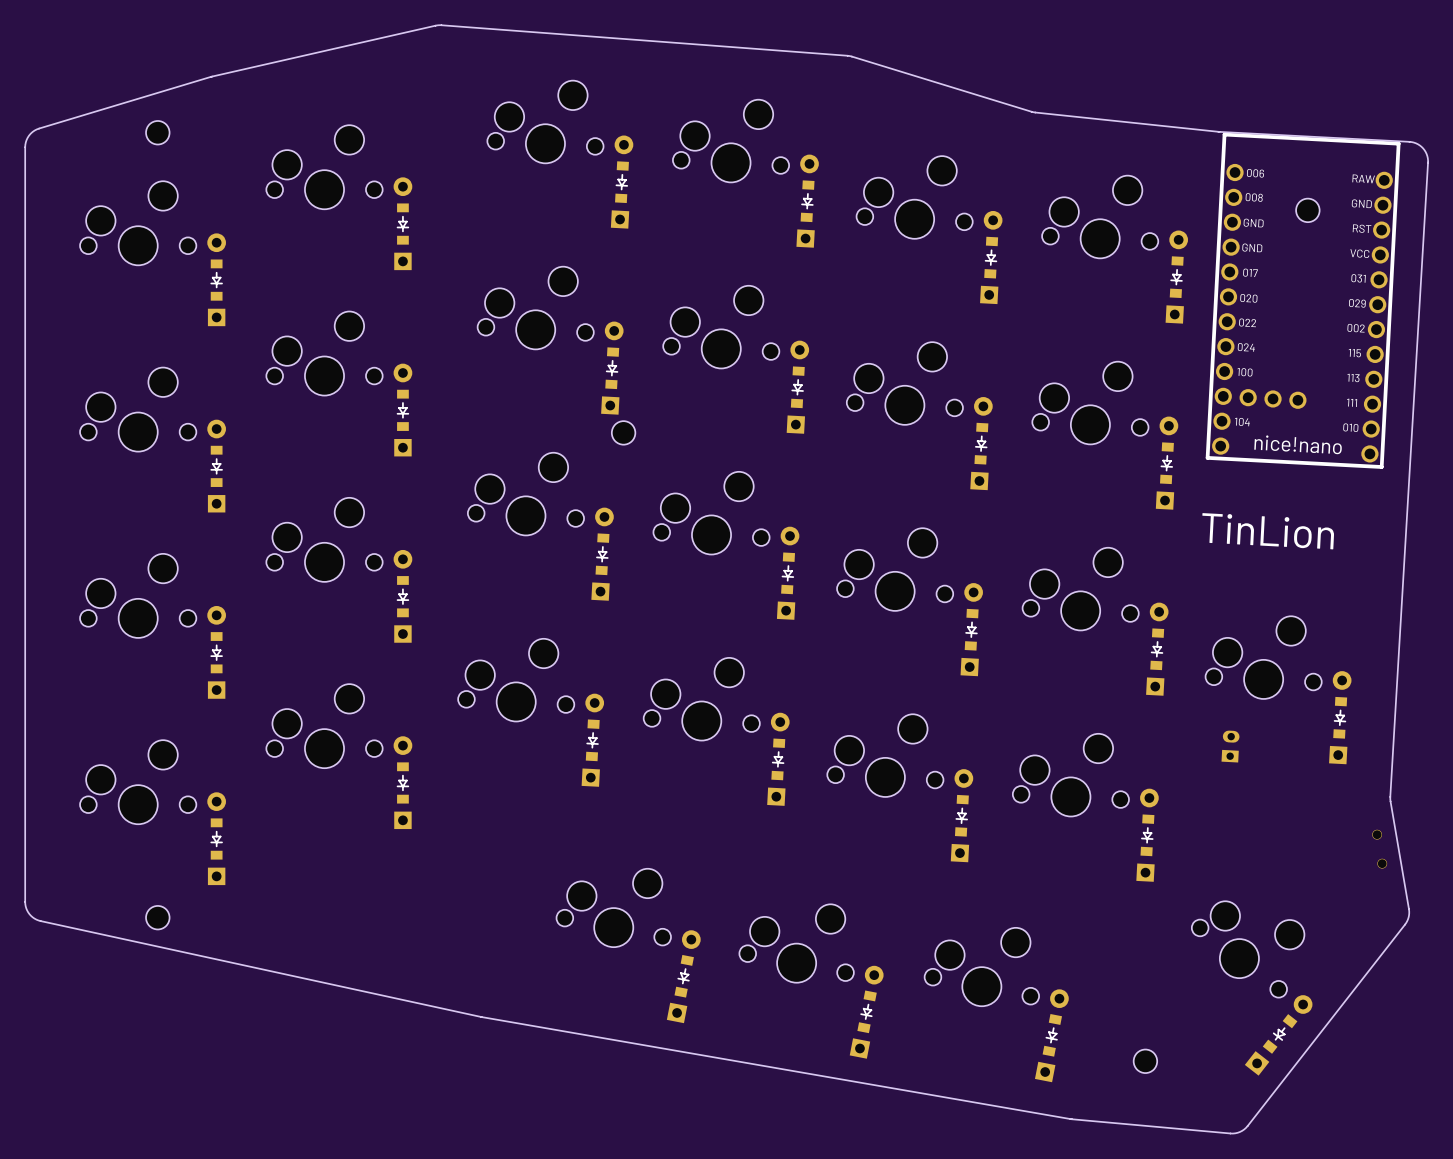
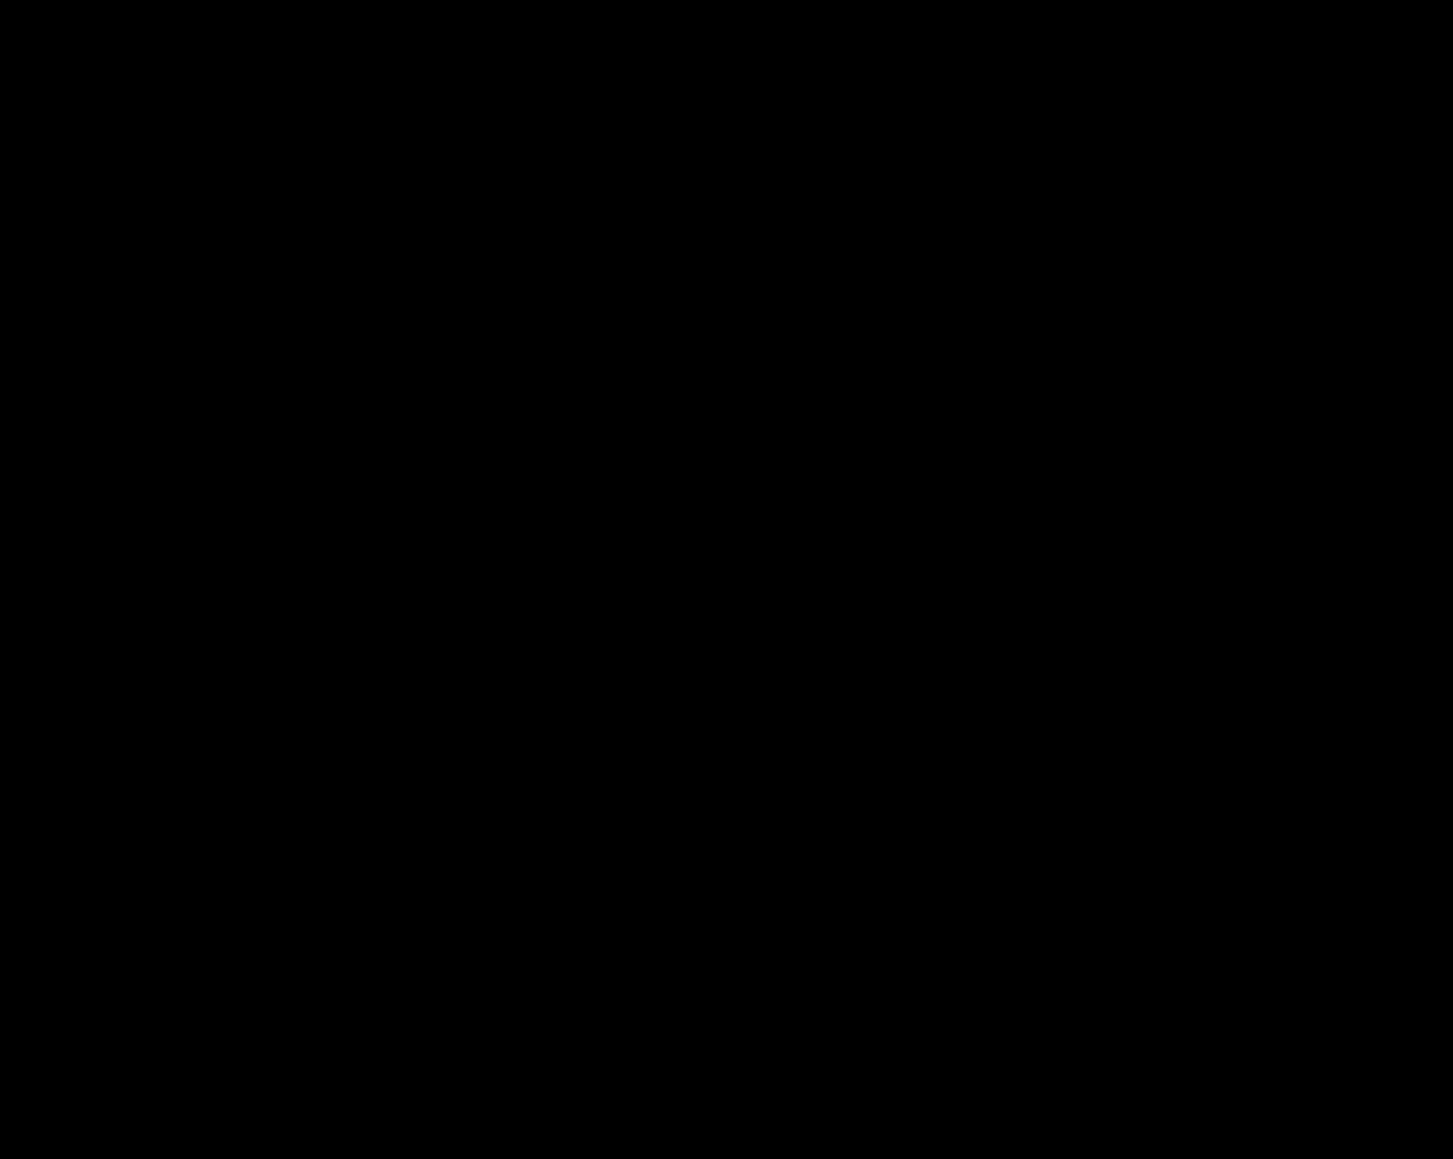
part: (545, 121) -> none
part: (157, 132) -> none
part: (731, 141) -> none
board edge: (25, 147) (25, 901) (28, 912) (34, 918) (481, 1017) (1070, 1119) (1232, 1133) (1242, 1130) (1247, 1126) (1406, 922) (1408, 909) (1390, 796) (1428, 162) (1425, 151) (1417, 144) (1409, 141) (1218, 131) (1033, 112) (847, 55) (439, 25) (210, 76) (36, 129) (27, 137) (25, 147) -> none
part: (324, 167) -> none
part: (622, 182) -> none
part: (914, 197) -> none
part: (807, 201) -> none
part: (1307, 210) -> none
part: (1100, 216) -> none
part: (138, 223) -> none
part: (402, 223) -> none
part: (991, 257) -> none
part: (1176, 277) -> none
part: (216, 279) -> none
part: (1303, 300) -> none
part: (535, 308) -> none
part: (721, 327) -> none
part: (324, 353) -> none
part: (612, 368) -> none
part: (904, 383) -> none
part: (797, 387) -> none
part: (1090, 403) -> none
part: (138, 409) -> none
part: (402, 410) -> none
part: (623, 432) -> none
part: (981, 443) -> none
part: (1167, 463) -> none
part: (216, 466) -> none
part: (525, 494) -> none
part: (711, 513) -> none
text: TinLion (1268, 531) -> none
part: (324, 539) -> none
part: (602, 554) -> none
part: (895, 569) -> none
part: (788, 573) -> none
part: (1080, 589) -> none
part: (138, 595) -> none
part: (402, 596) -> none
part: (971, 629) -> none
part: (1157, 649) -> none
part: (216, 652) -> none
part: (1263, 657) -> none
part: (516, 680) -> none
part: (701, 699) -> none
part: (1340, 717) -> none
part: (324, 726) -> none
part: (592, 740) -> none
part: (1230, 746) -> none
part: (885, 755) -> none
part: (778, 759) -> none
part: (1070, 775) -> none
part: (138, 782) -> none
part: (402, 782) -> none
part: (962, 815) -> none
part: (1147, 835) -> none
part: (216, 838) -> none
part: (1379, 849) -> none
part: (613, 907) -> none
part: (157, 917) -> none
part: (796, 943) -> none
part: (1248, 949) -> none
part: (981, 967) -> none
part: (683, 976) -> none
part: (866, 1012) -> none
part: (1051, 1035) -> none
part: (1278, 1035) -> none
part: (1145, 1061) -> none

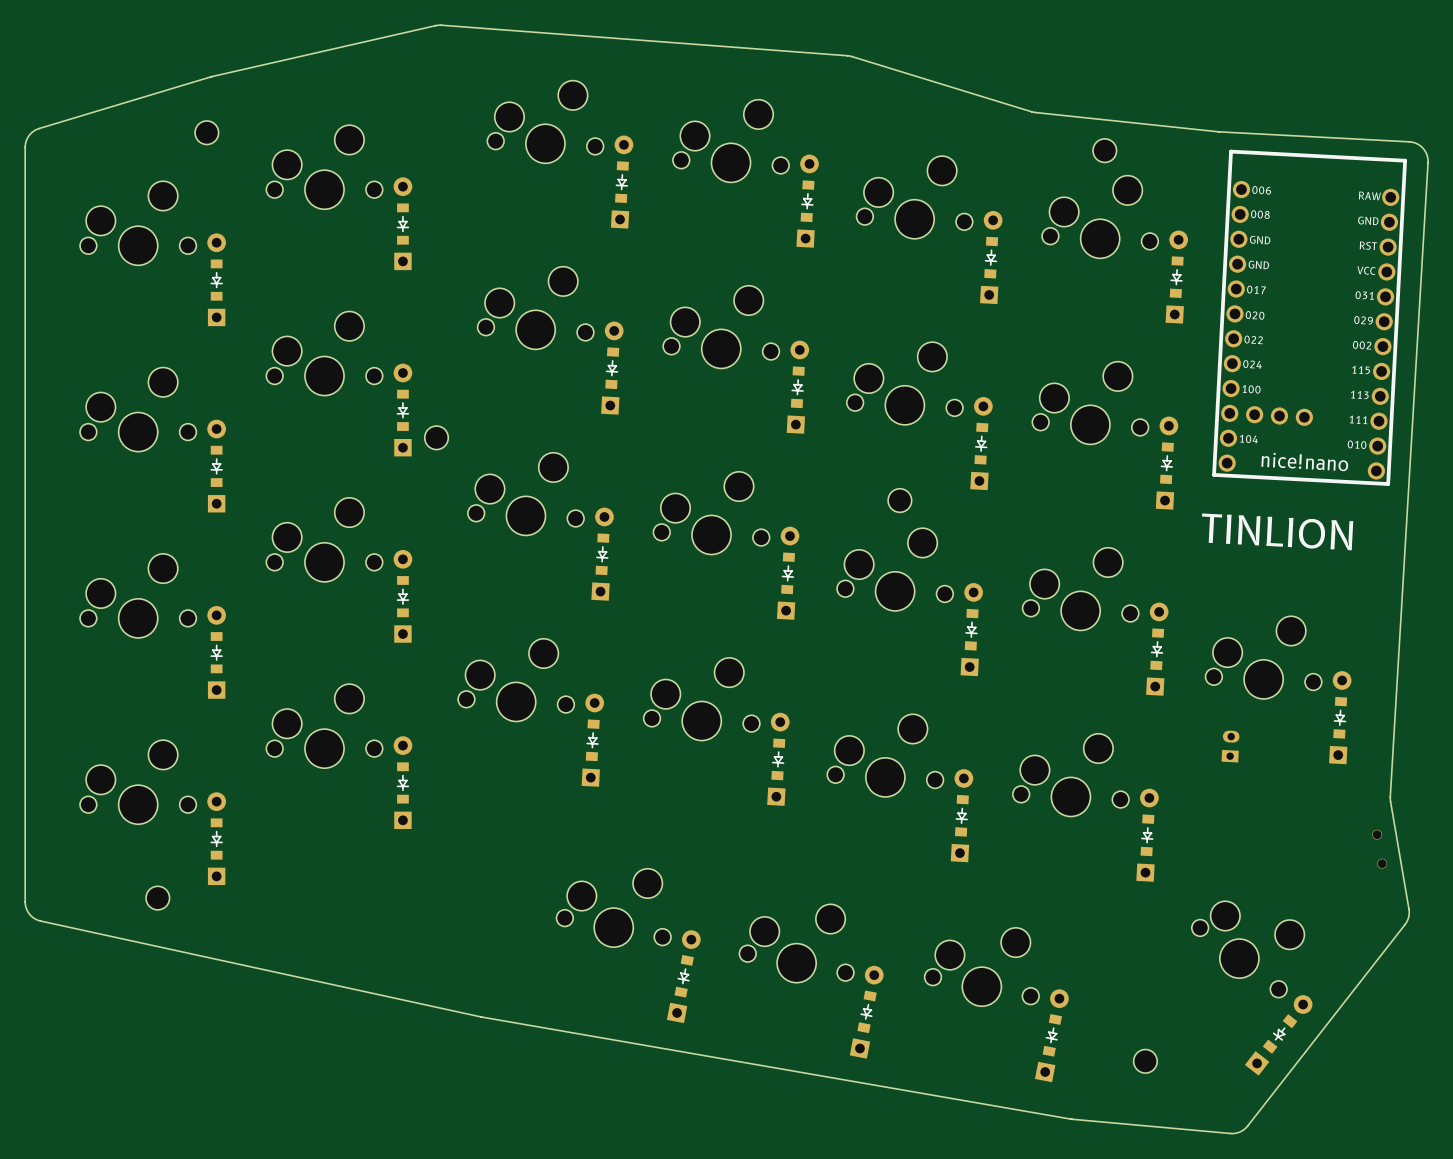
part: none -> (545, 121)
part: none -> (206, 132)
part: none -> (731, 141)
board edge: none -> (25, 147) (25, 901) (28, 912) (34, 918) (481, 1017) (1070, 1119) (1232, 1133) (1242, 1130) (1247, 1126) (1406, 922) (1408, 909) (1390, 796) (1428, 162) (1425, 151) (1417, 144) (1409, 141) (1218, 131) (1033, 112) (847, 55) (439, 25) (210, 76) (36, 129) (27, 137) (25, 147)
part: none -> (1104, 150)
part: none -> (324, 167)
part: none -> (622, 182)
part: none -> (914, 197)
part: none -> (807, 201)
part: none -> (1100, 216)
part: none -> (138, 223)
part: none -> (402, 223)
part: none -> (991, 257)
part: none -> (1176, 277)
part: none -> (216, 279)
part: none -> (535, 308)
part: none -> (1309, 317)
part: none -> (721, 327)
part: none -> (324, 353)
part: none -> (612, 368)
part: none -> (904, 383)
part: none -> (797, 387)
part: none -> (1090, 403)
part: none -> (138, 409)
part: none -> (402, 410)
part: none -> (436, 437)
part: none -> (981, 443)
part: none -> (1167, 463)
part: none -> (216, 466)
part: none -> (525, 494)
part: none -> (899, 500)
part: none -> (711, 513)
text: none -> TINLION (1277, 531)
part: none -> (324, 539)
part: none -> (602, 554)
part: none -> (895, 569)
part: none -> (788, 573)
part: none -> (1080, 589)
part: none -> (138, 595)
part: none -> (402, 596)
part: none -> (971, 629)
part: none -> (1157, 649)
part: none -> (216, 652)
part: none -> (1263, 657)
part: none -> (516, 680)
part: none -> (701, 699)
part: none -> (1340, 717)
part: none -> (324, 726)
part: none -> (592, 740)
part: none -> (1230, 746)
part: none -> (885, 755)
part: none -> (778, 759)
part: none -> (1070, 775)
part: none -> (138, 782)
part: none -> (402, 782)
part: none -> (962, 815)
part: none -> (1147, 835)
part: none -> (216, 838)
part: none -> (1379, 849)
part: none -> (157, 898)
part: none -> (613, 907)
part: none -> (796, 943)
part: none -> (1248, 949)
part: none -> (981, 967)
part: none -> (683, 976)
part: none -> (866, 1012)
part: none -> (1051, 1035)
part: none -> (1278, 1035)
part: none -> (1145, 1061)

